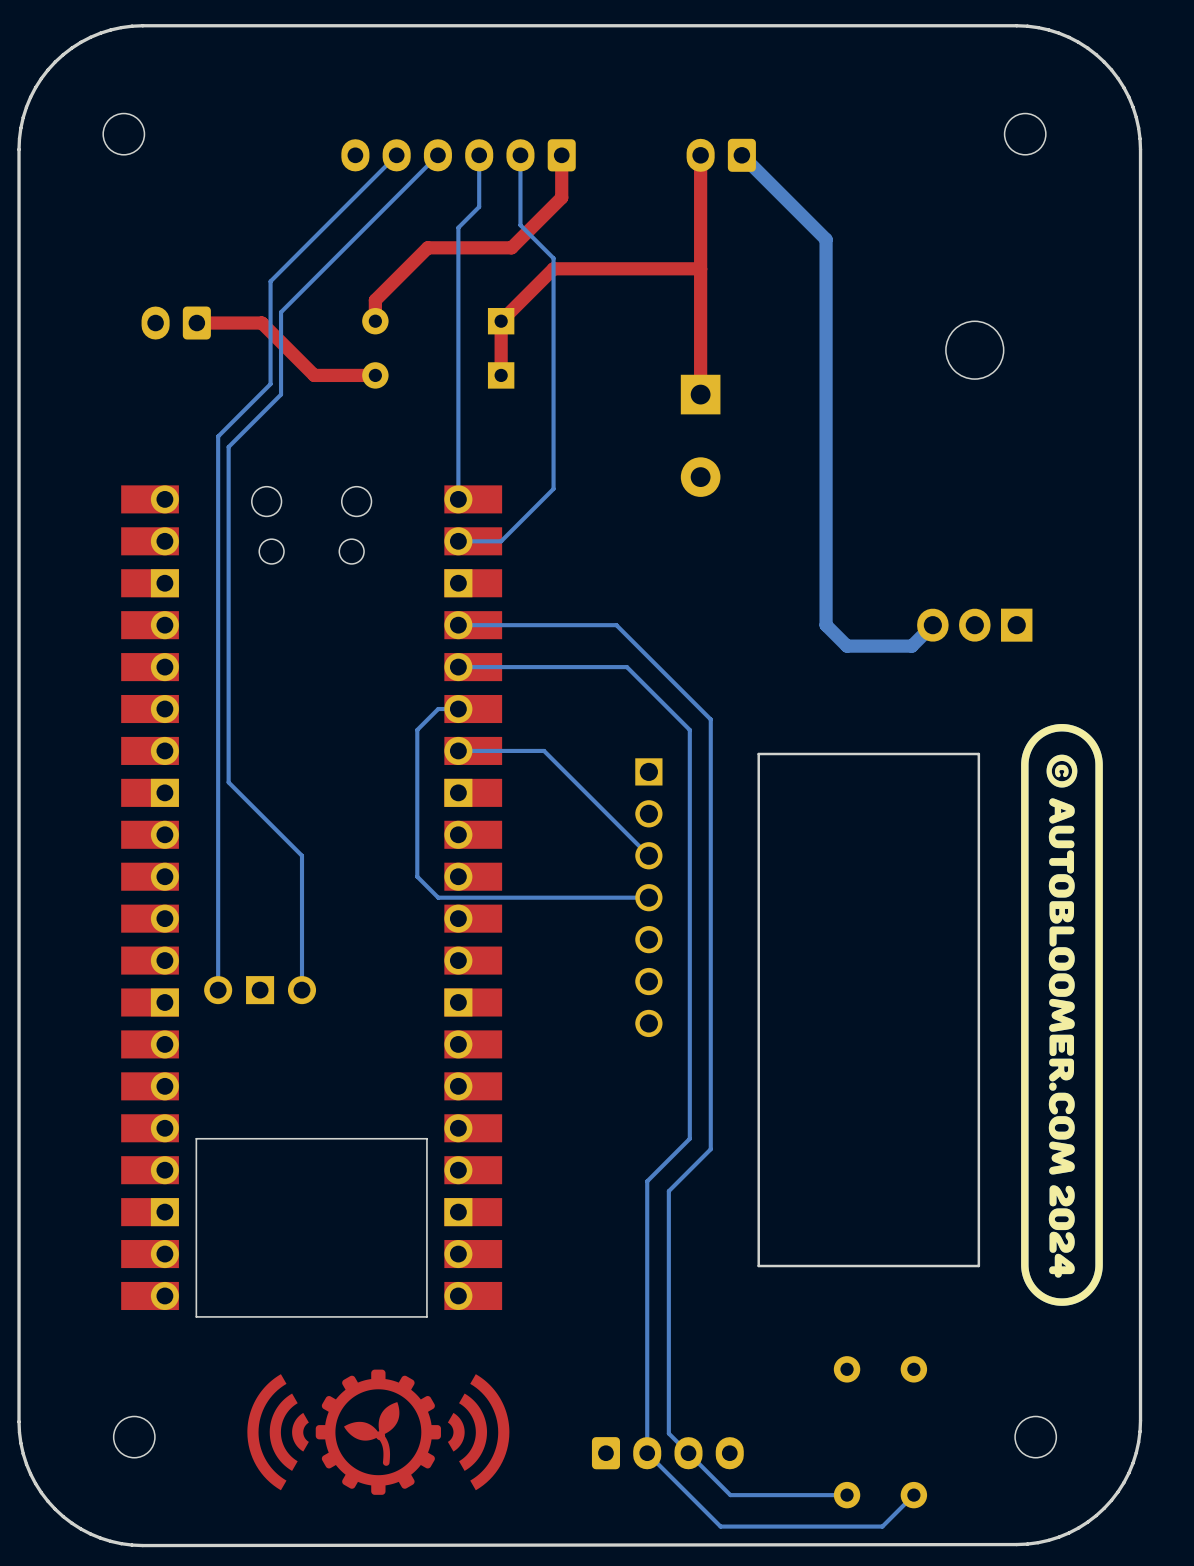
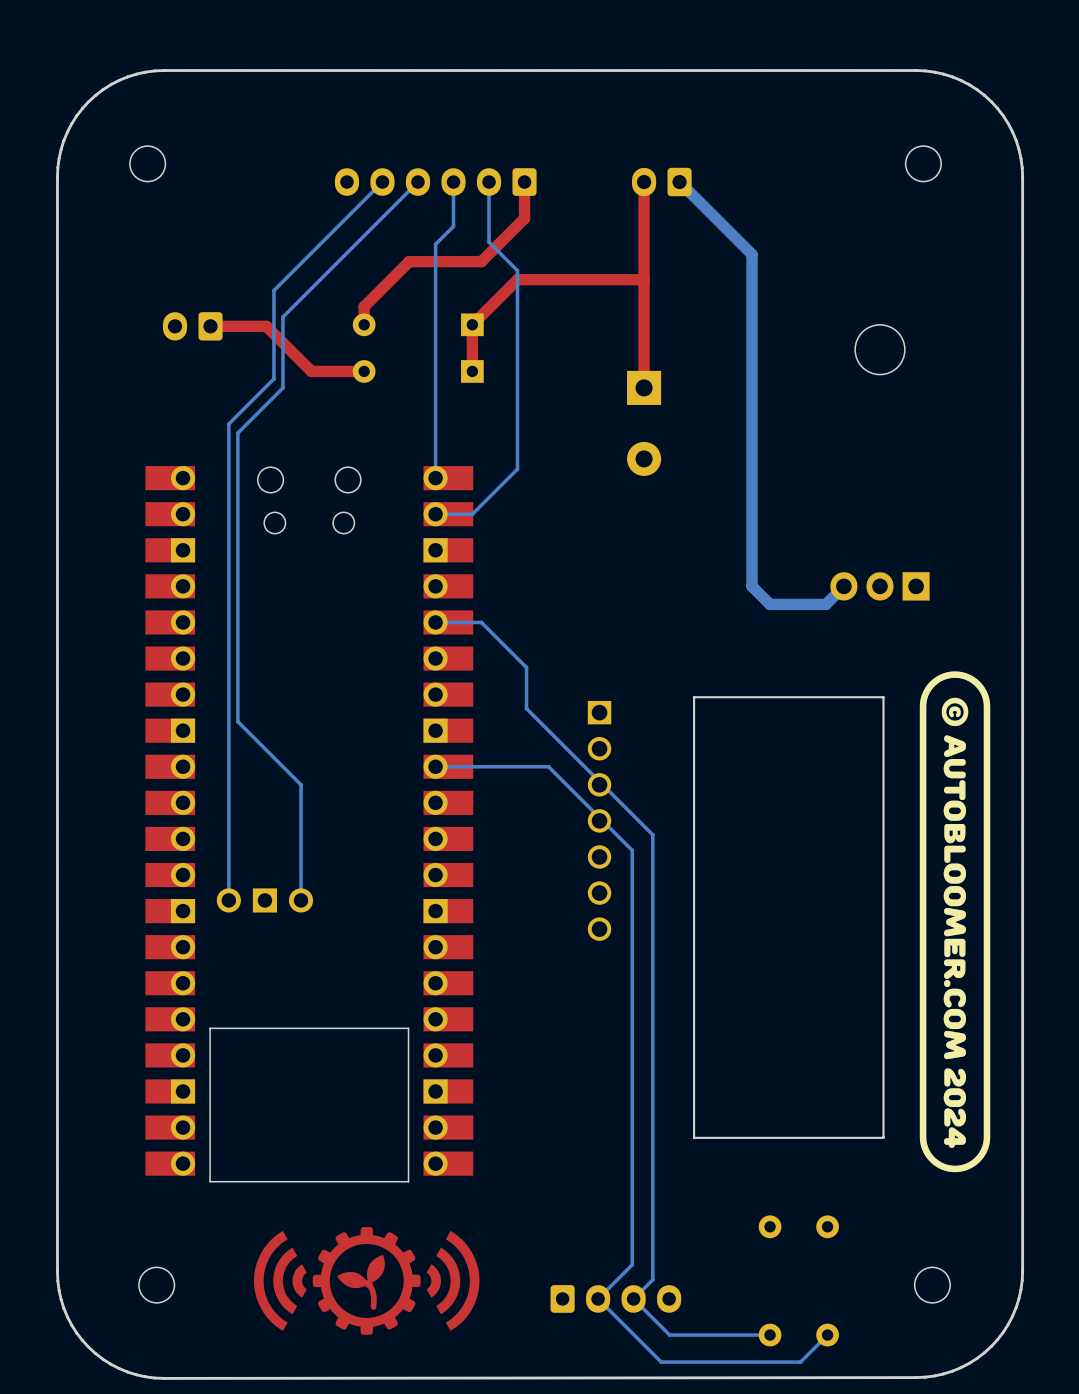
bottom track: (458, 625) (616, 625) (710, 719) (710, 913) -> (481, 622) (526, 667) (526, 708) (652, 834)
bottom track: (511, 667) (626, 667) (689, 729) (689, 1138) (647, 1181) (647, 1453) -> (435, 766) (548, 766) (632, 850) (632, 1264) (598, 1298)
bottom track: (458, 709) (438, 709) (417, 729) (417, 876) (438, 897) (648, 897) -> none
bottom track: (458, 750) (544, 750) (648, 855) -> none
bottom track: (710, 1149) (668, 1191) (668, 1433) (688, 1453) -> (652, 1037) (652, 1279) (633, 1298)

